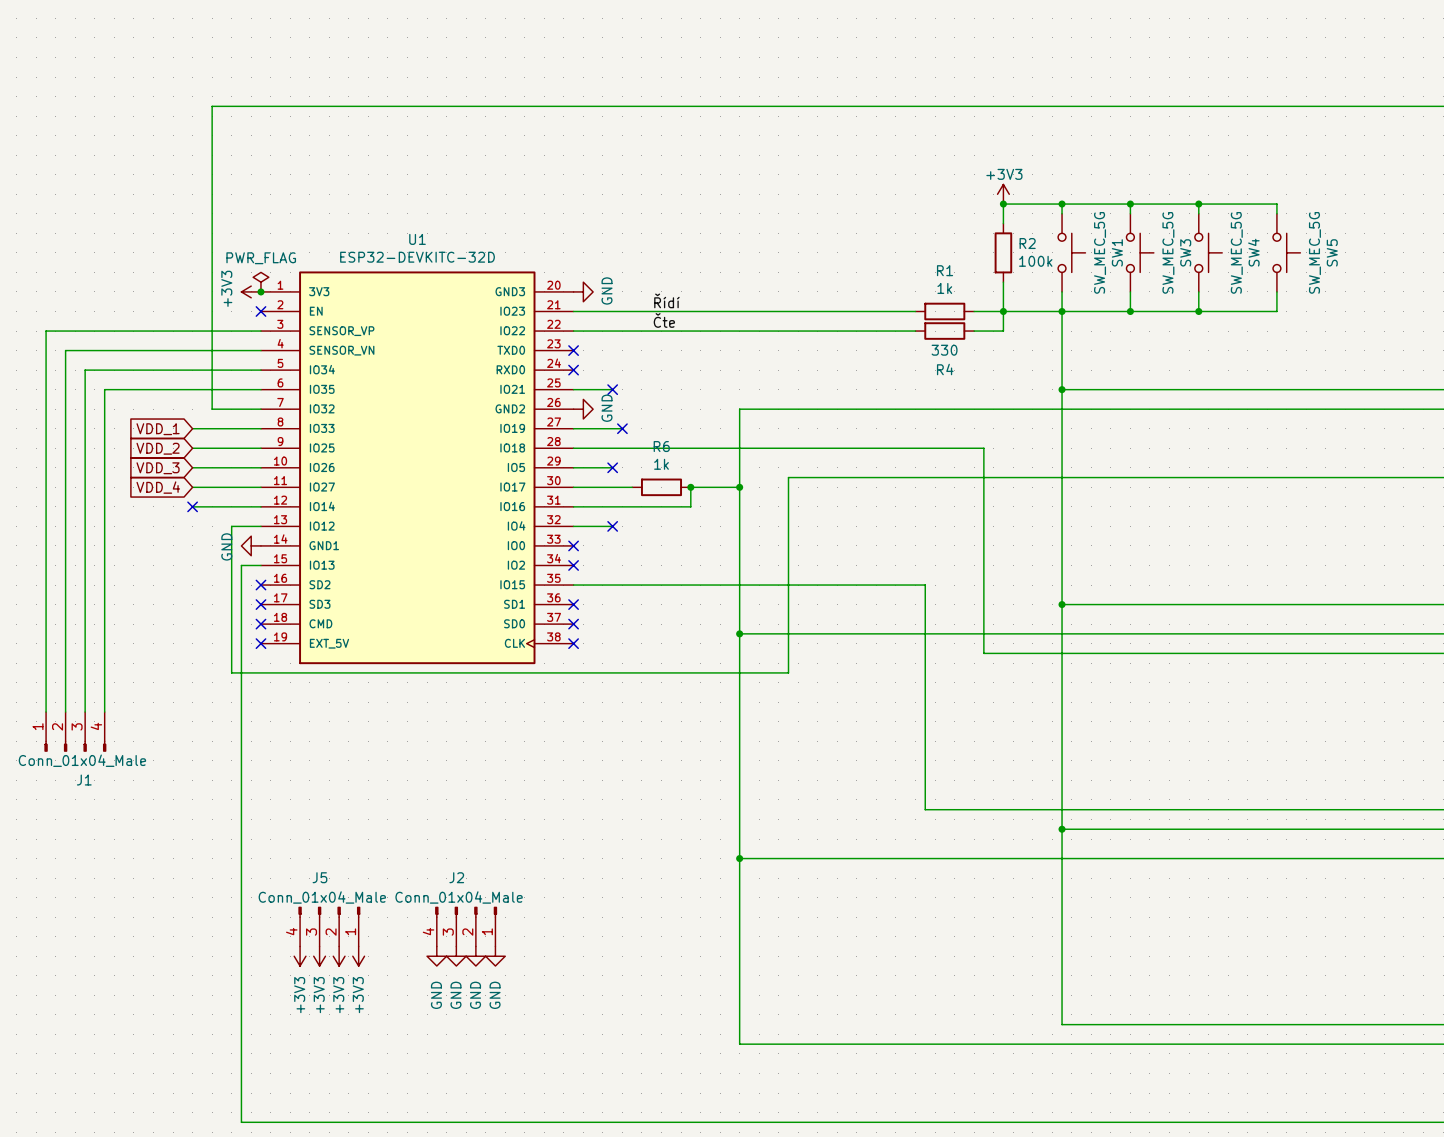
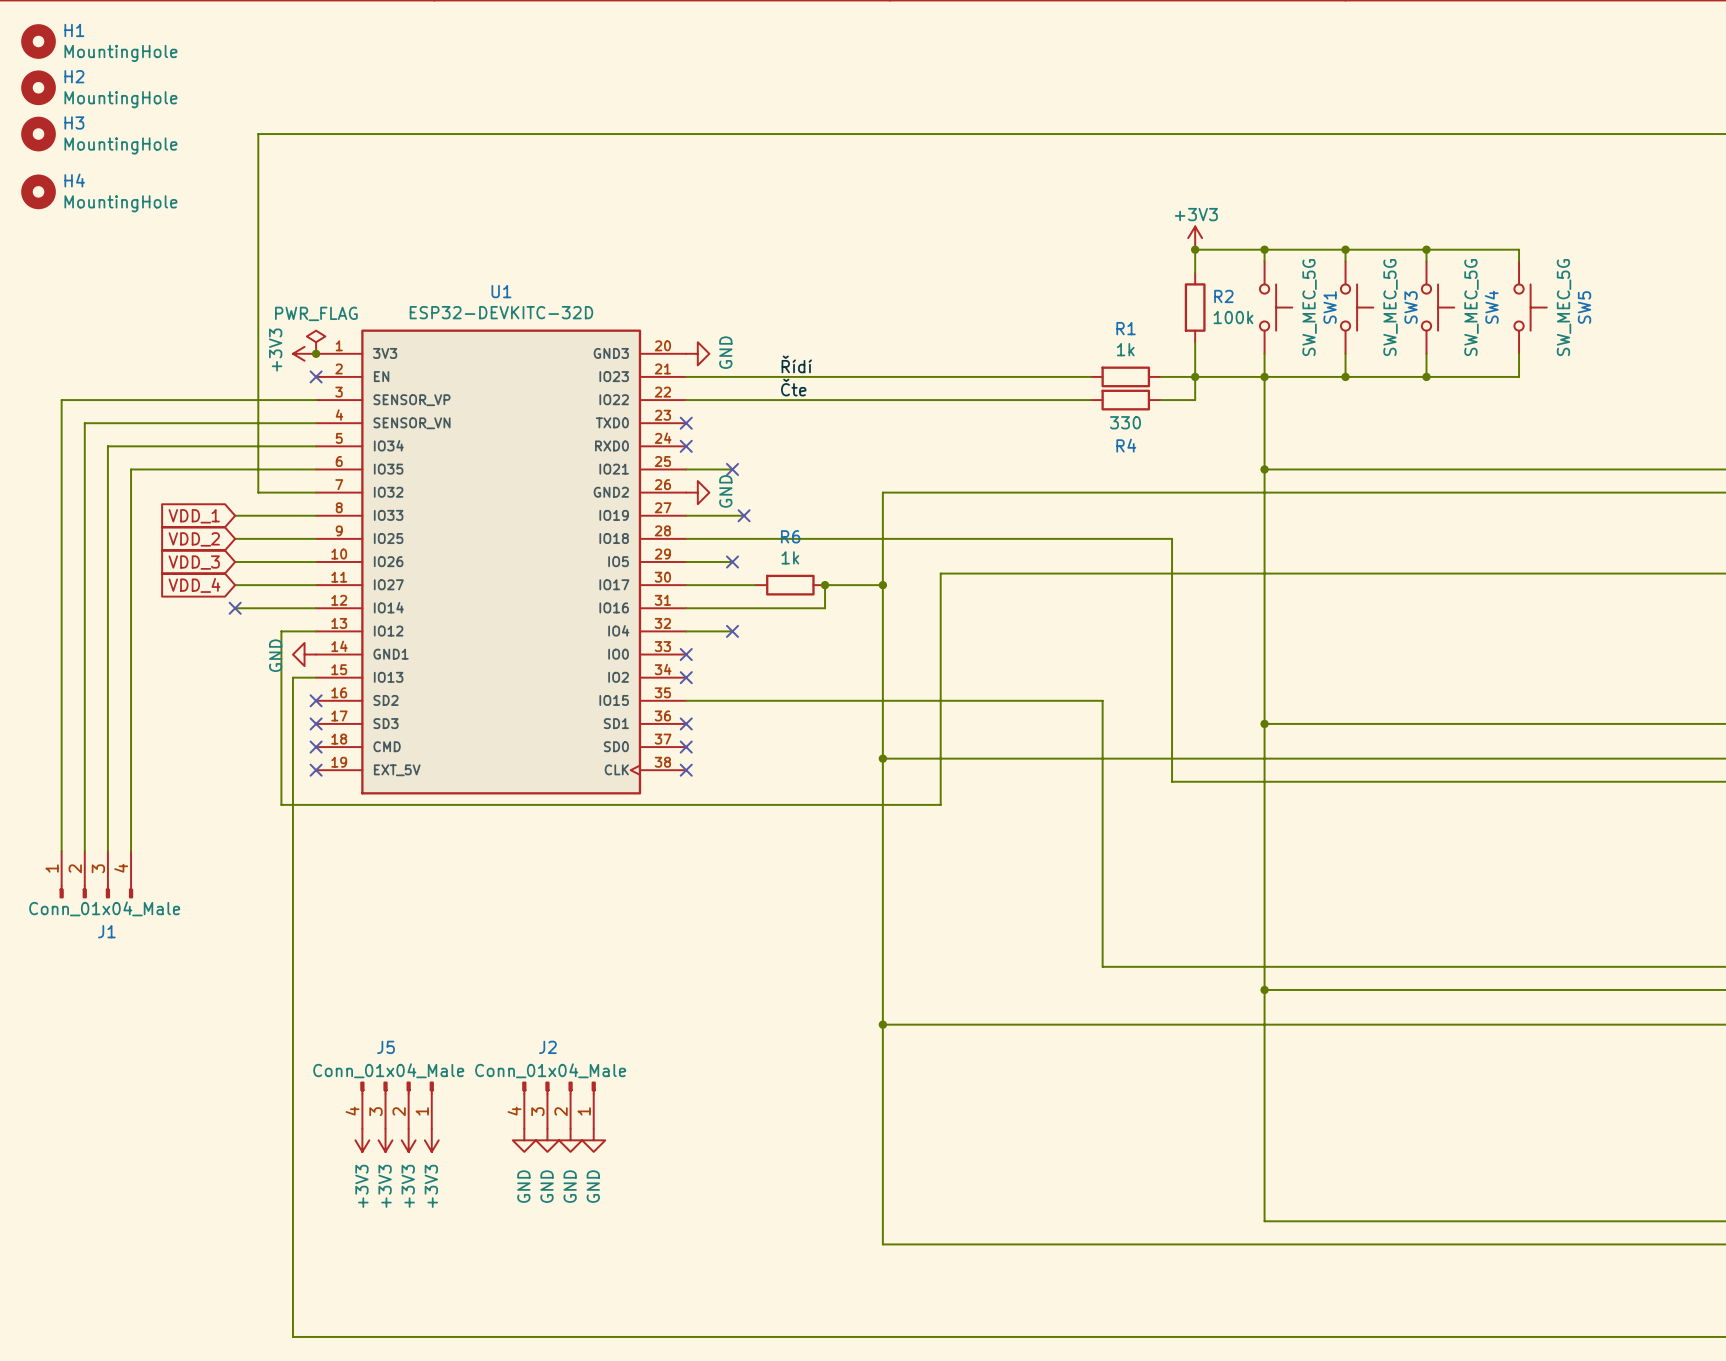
H1: none -> MountingHole (38, 41)
H2: none -> MountingHole (38, 87)
H3: none -> MountingHole (38, 134)
H4: none -> MountingHole (38, 191)

